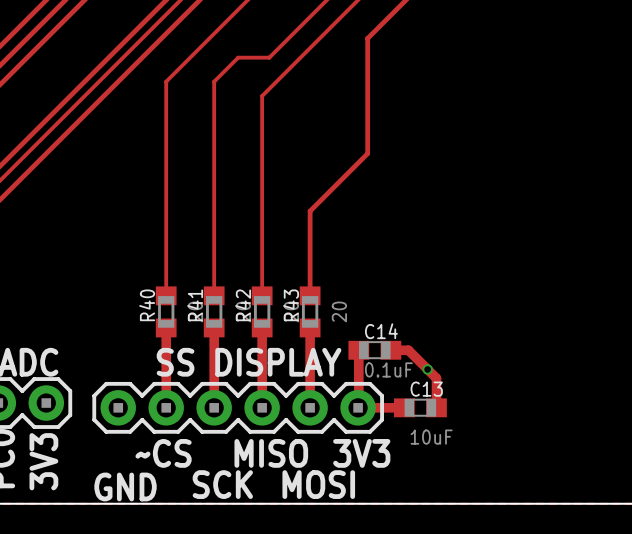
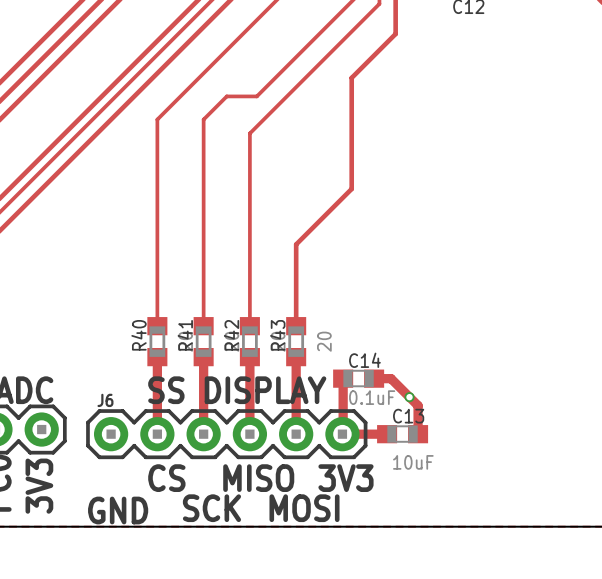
J6 name: none -> J6 (105, 400)
text: ~CS (163, 453) -> CS (166, 478)

